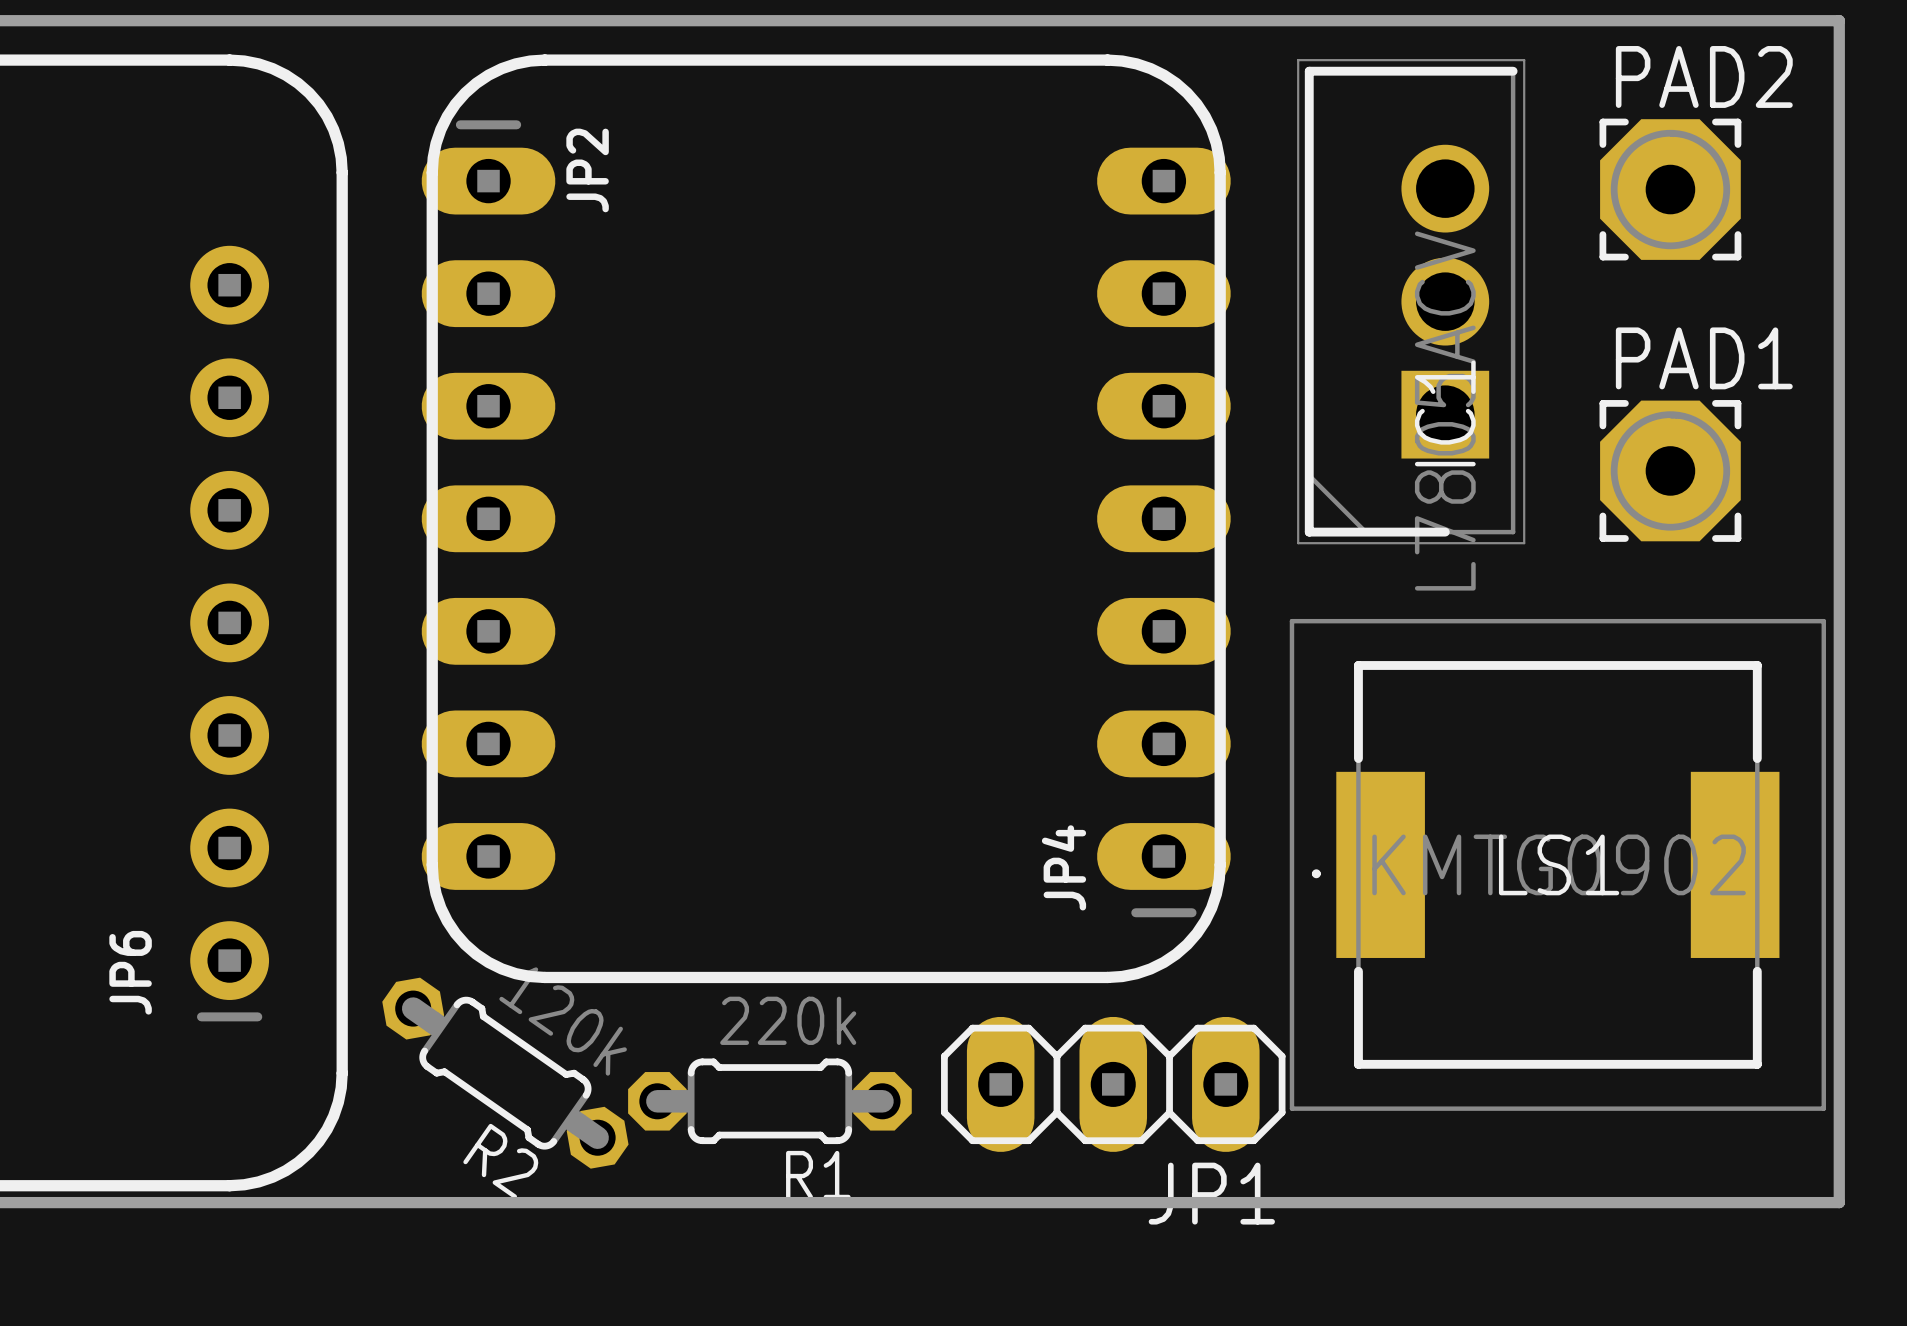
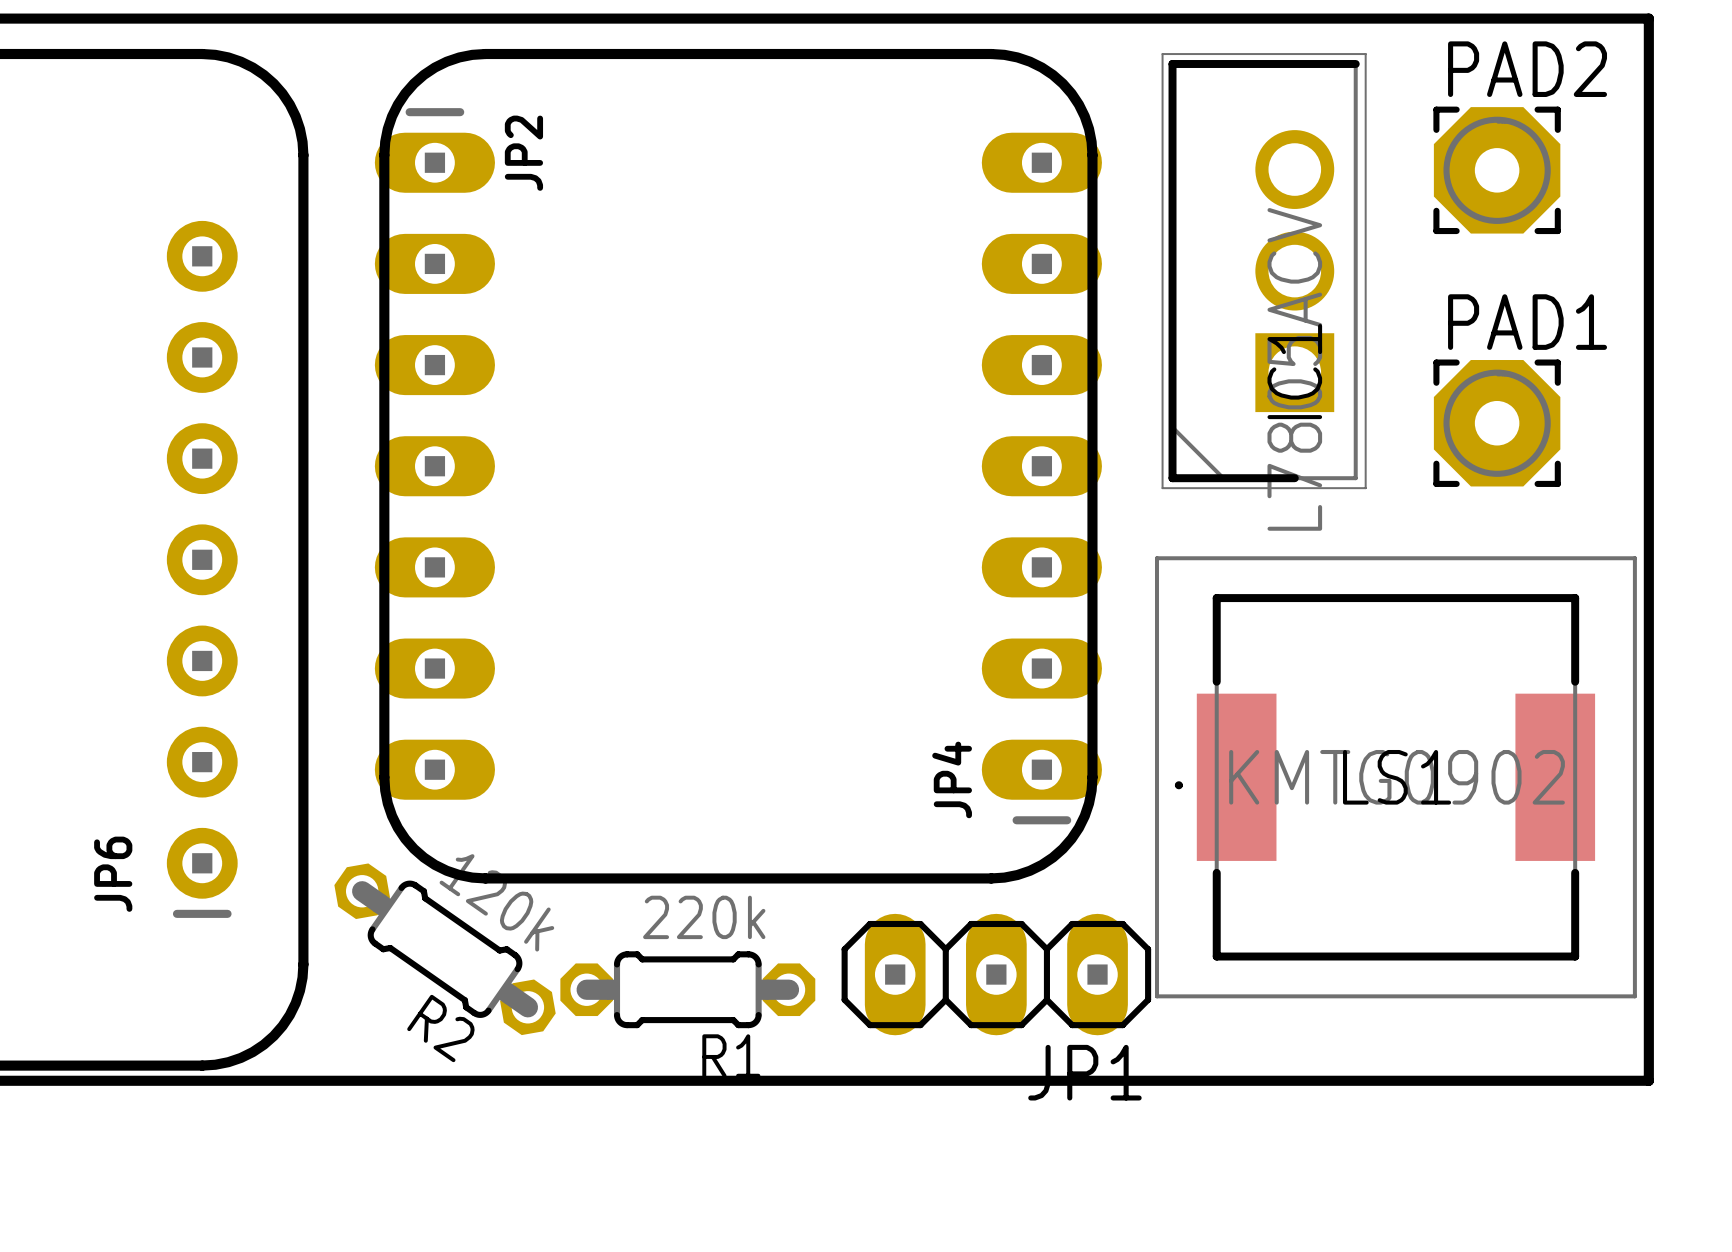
R2 position: (505, 1073) -> (445, 949)

